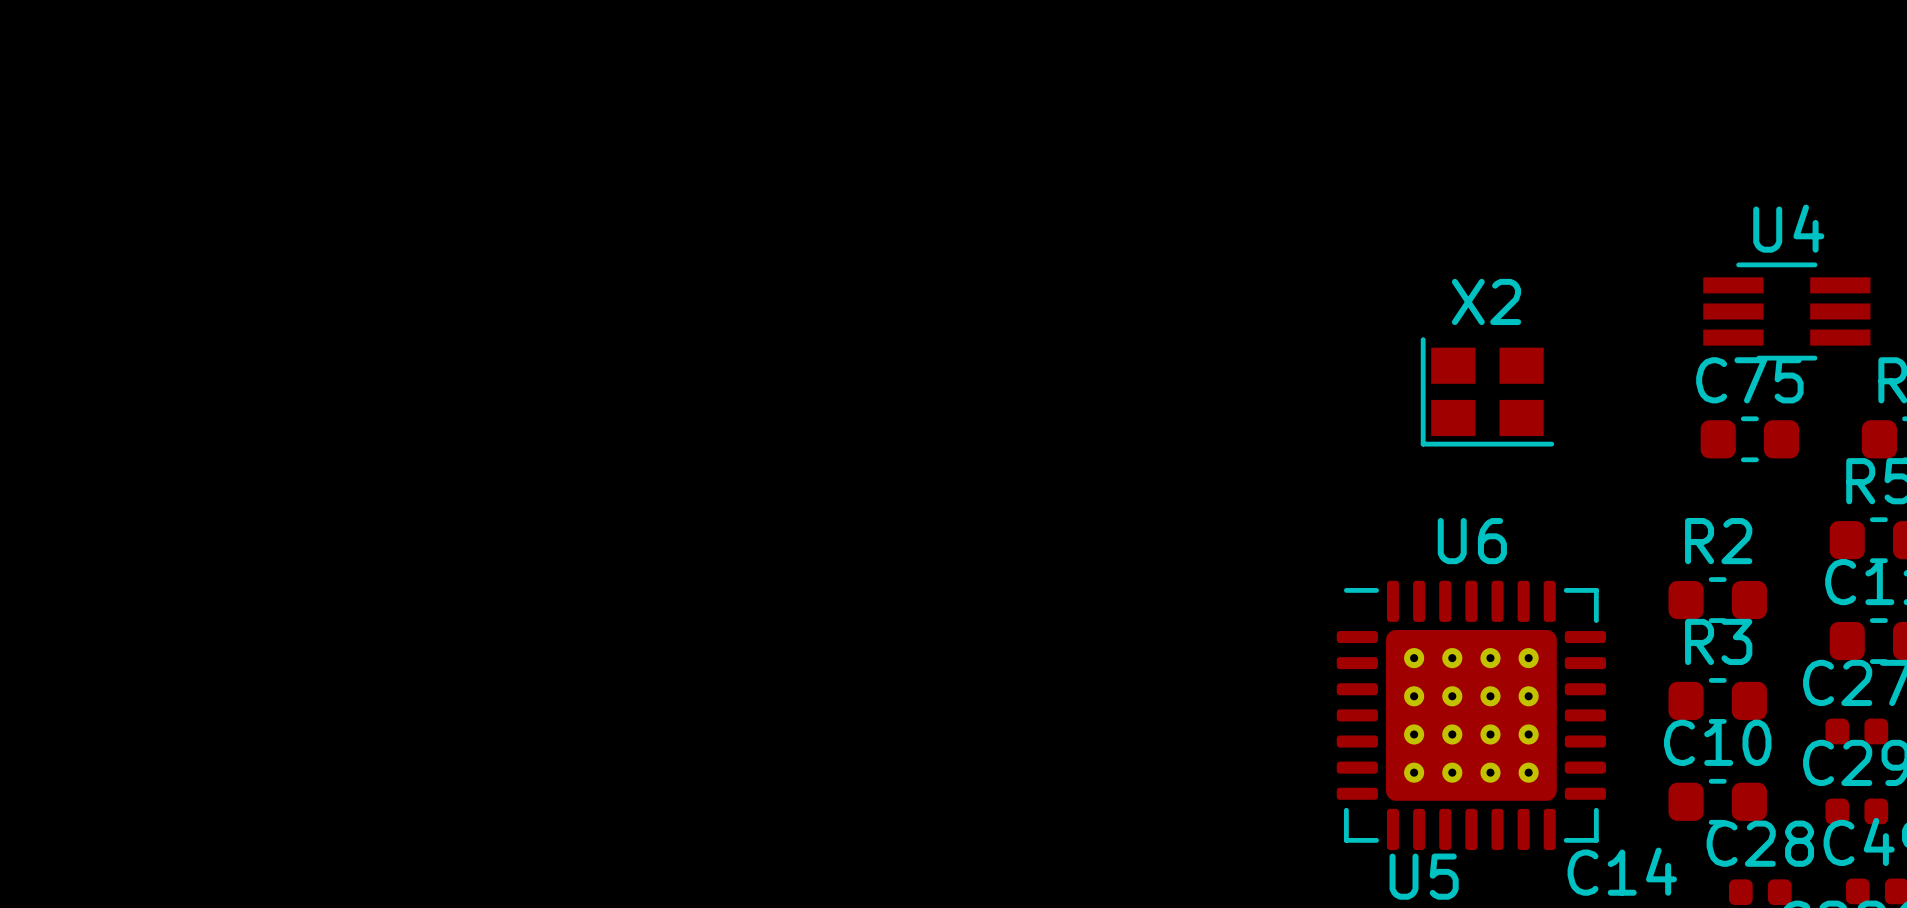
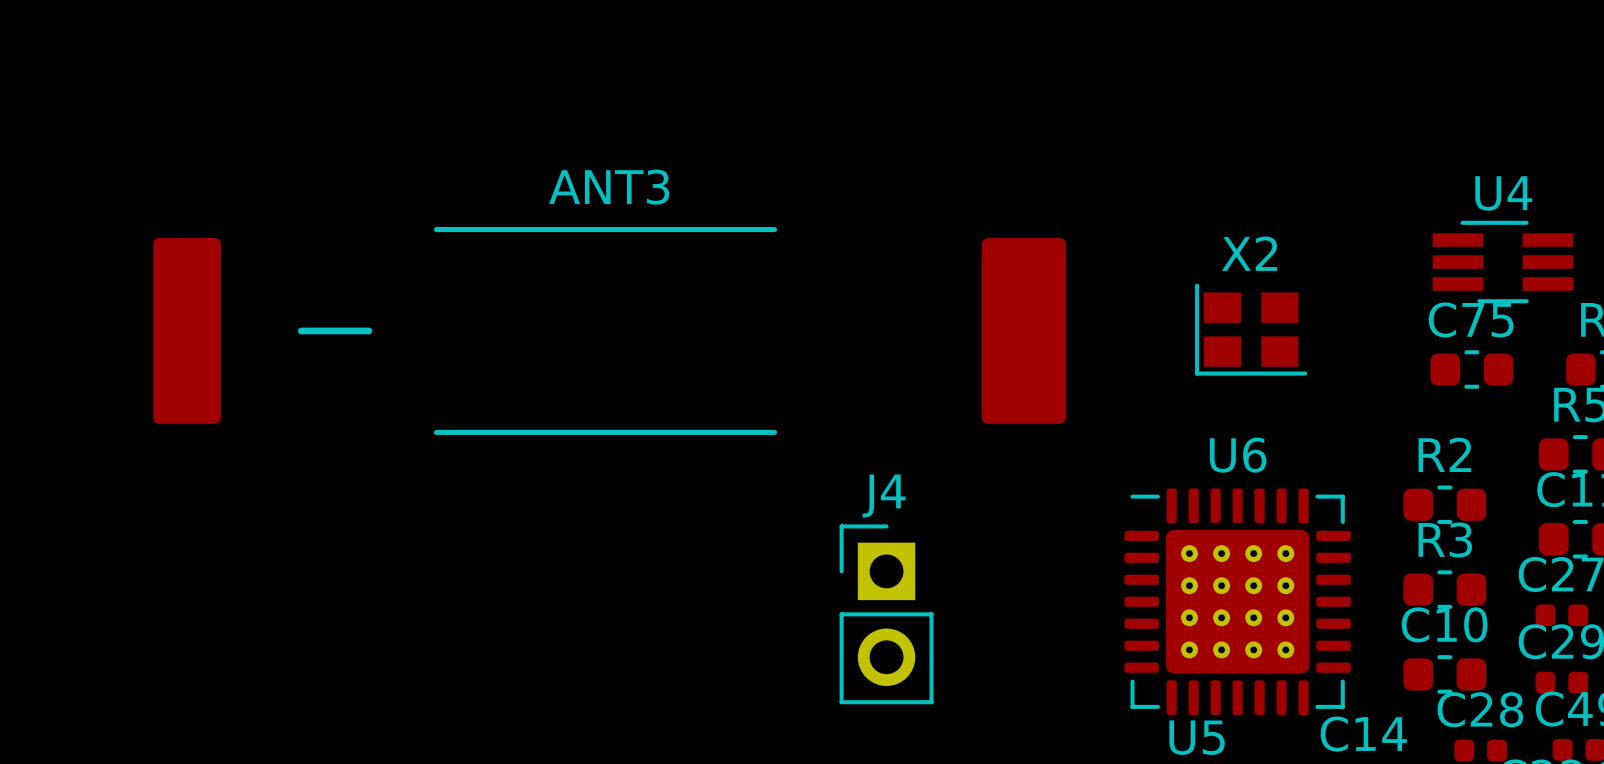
ANT3: none -> (609, 330)
J4: none -> (886, 614)

